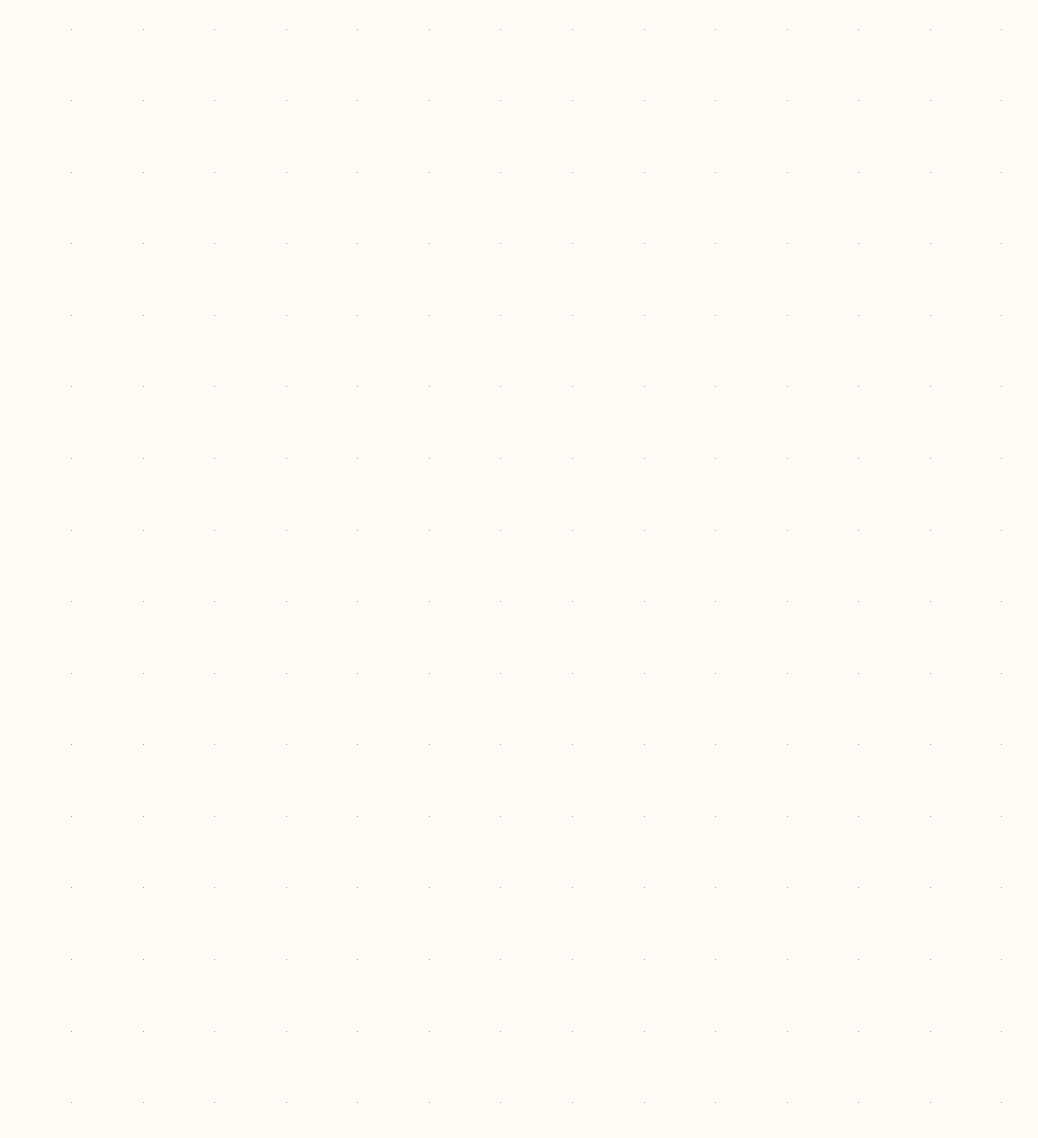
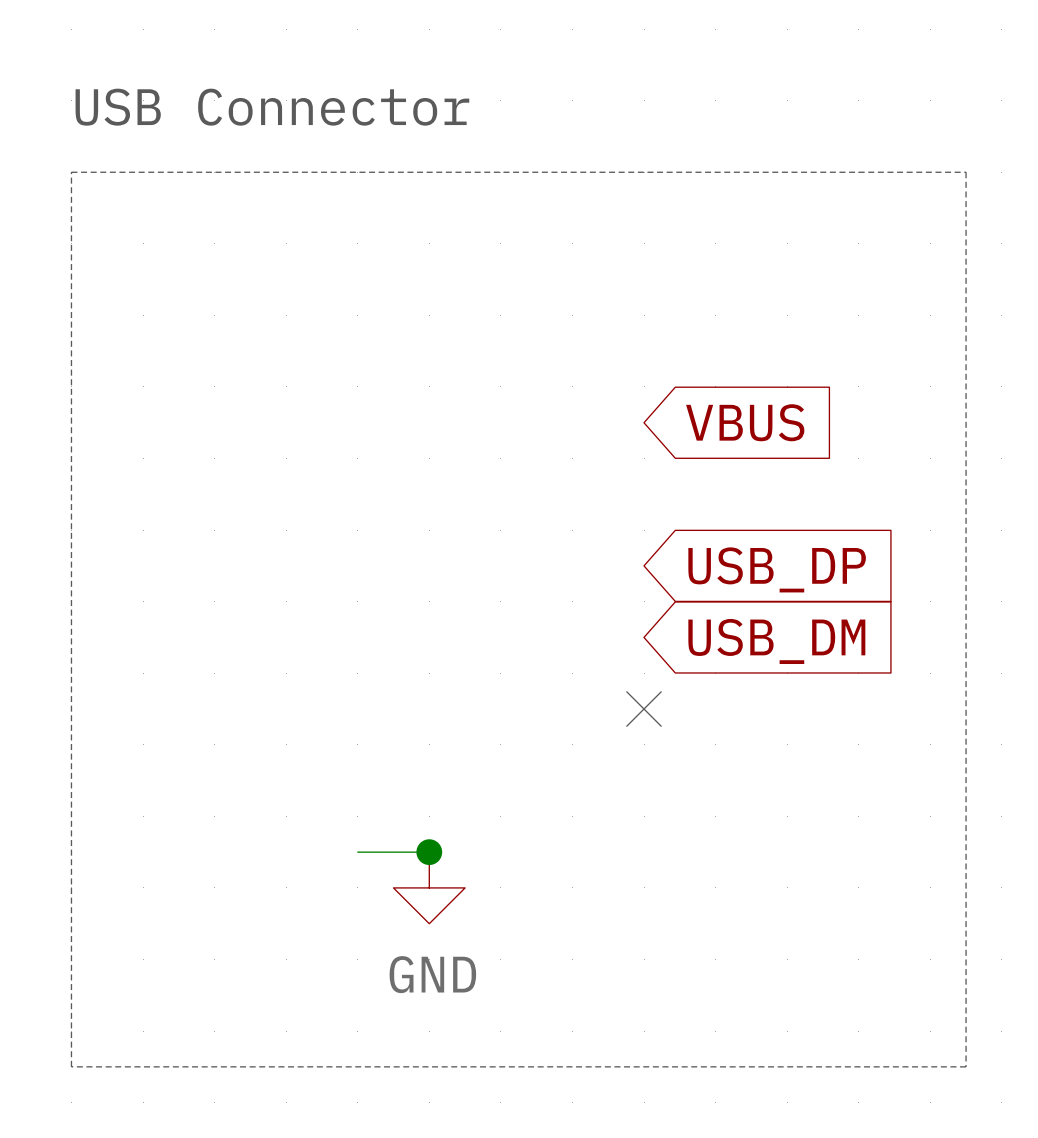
text: none -> USB Connector (272, 107)
line: none -> (71, 172) (966, 172) (966, 1066) (71, 1066) (71, 172)
global label: none -> VBUS (745, 422)
global label: none -> USB_DP (777, 569)
global label: none -> USB_DM (776, 641)
no-connect mark: none -> (644, 709)
wire: none -> (357, 852) (429, 852)
junction: none -> (429, 852)
power symbol: none -> GND (429, 887)

